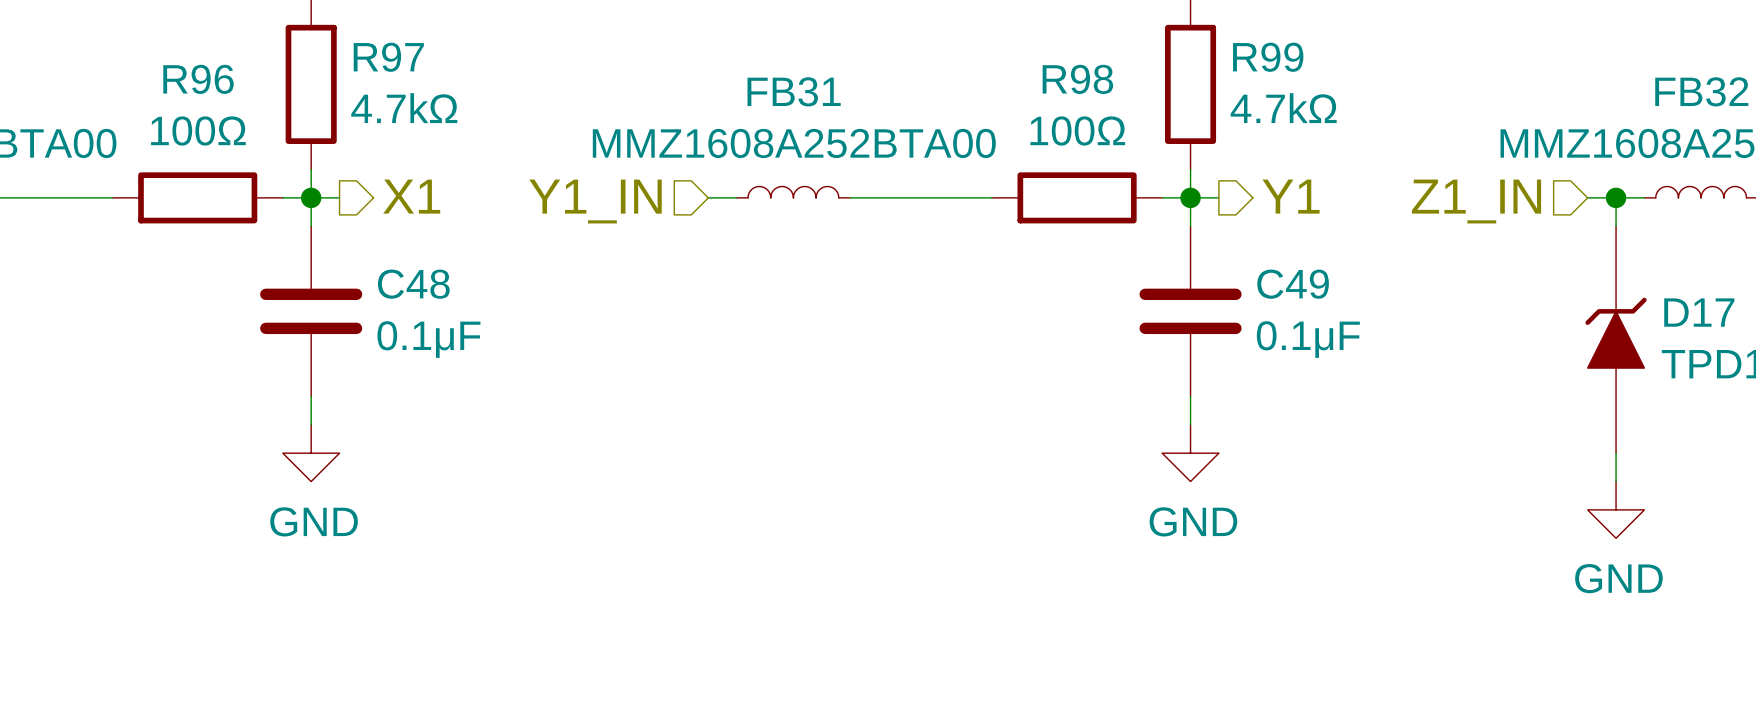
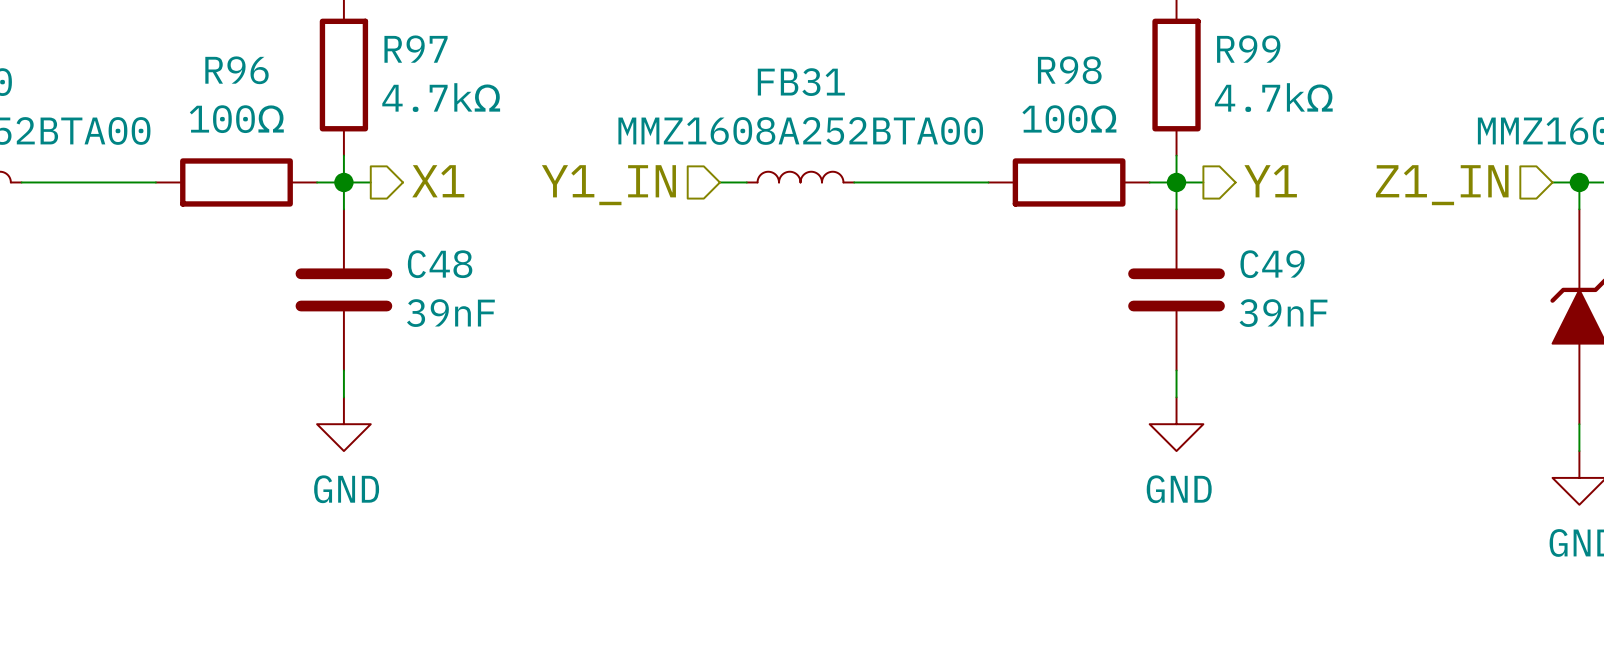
C48 value: 0.1μF (428, 339) -> 39nF (450, 313)
C49 value: 0.1μF (1308, 339) -> 39nF (1283, 313)

